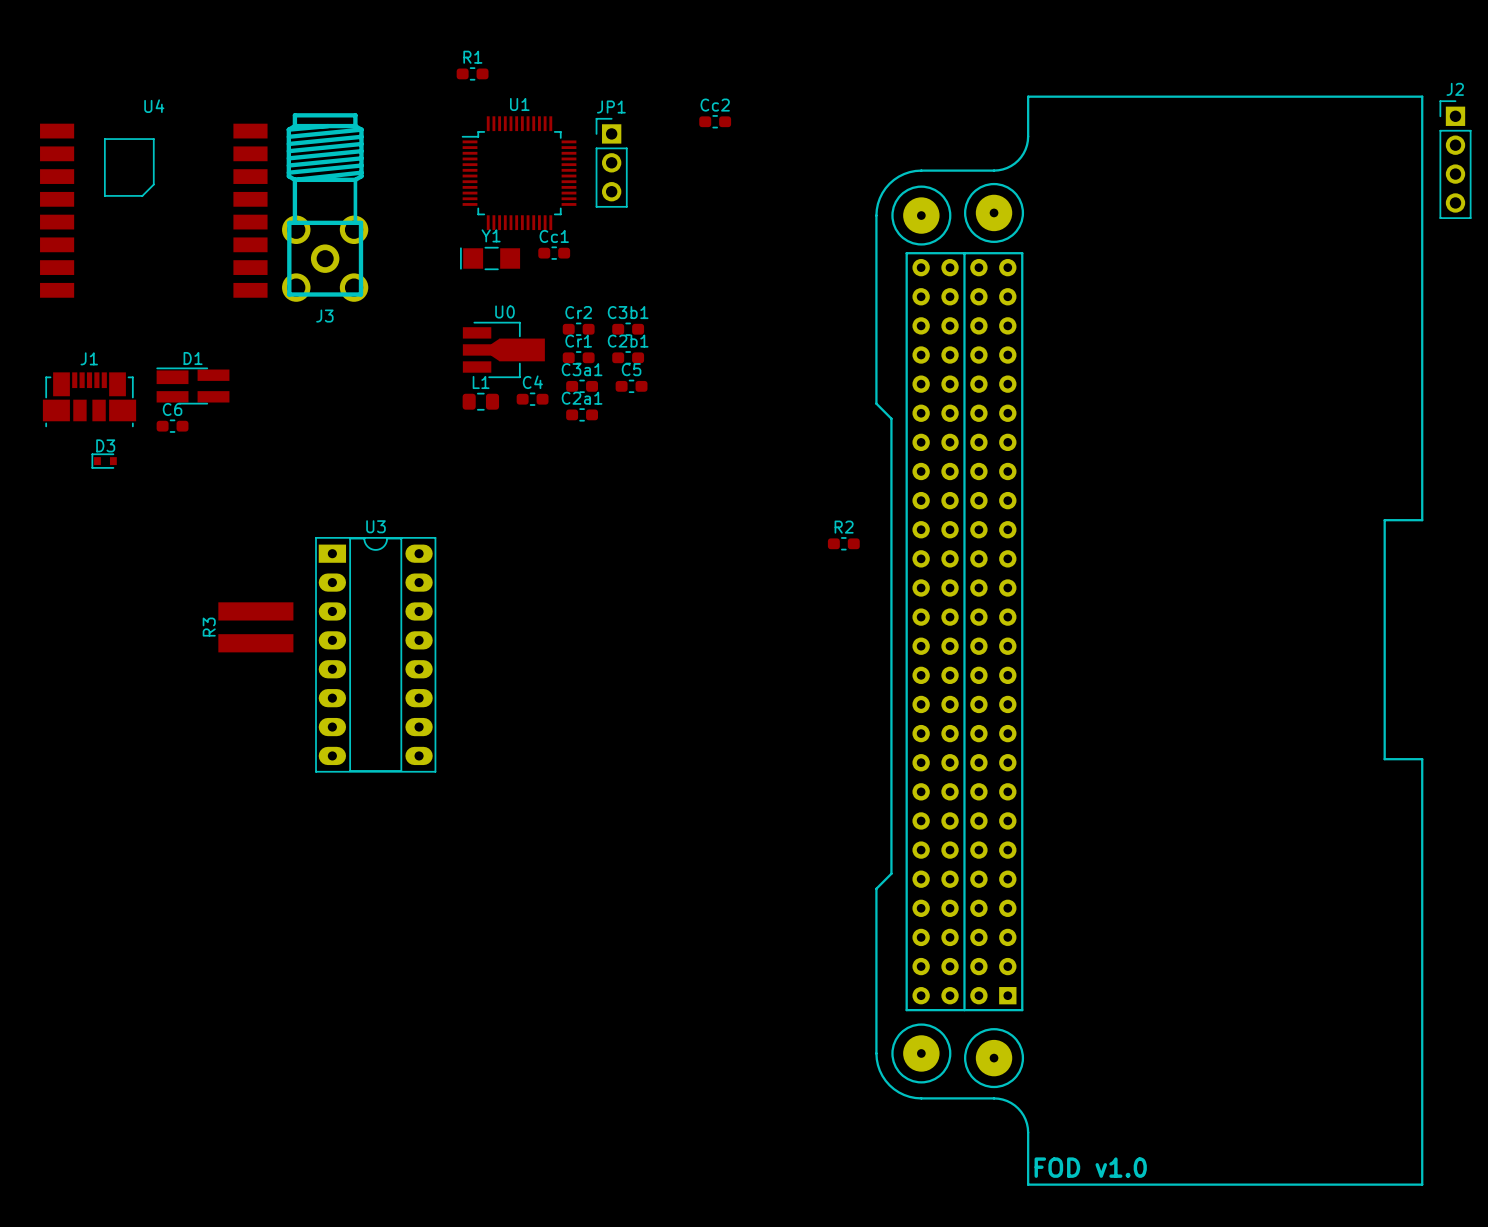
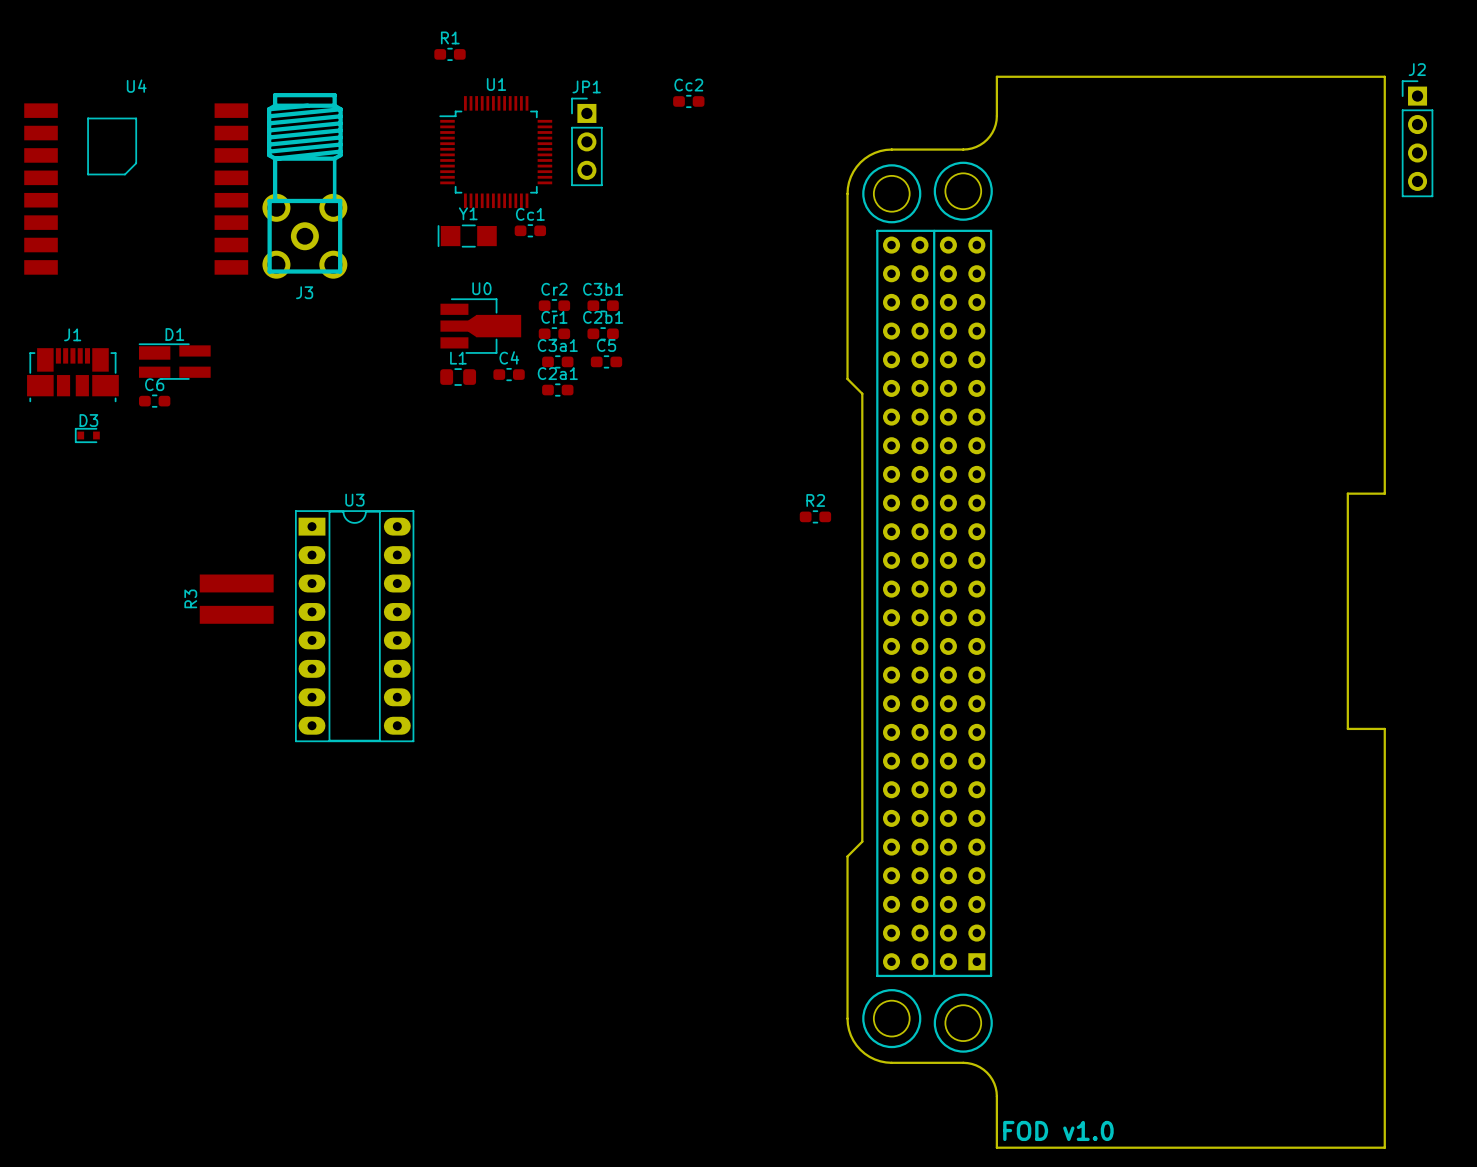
part footprint: [875, 95, 1424, 1186] -> [846, 75, 1386, 1149]

